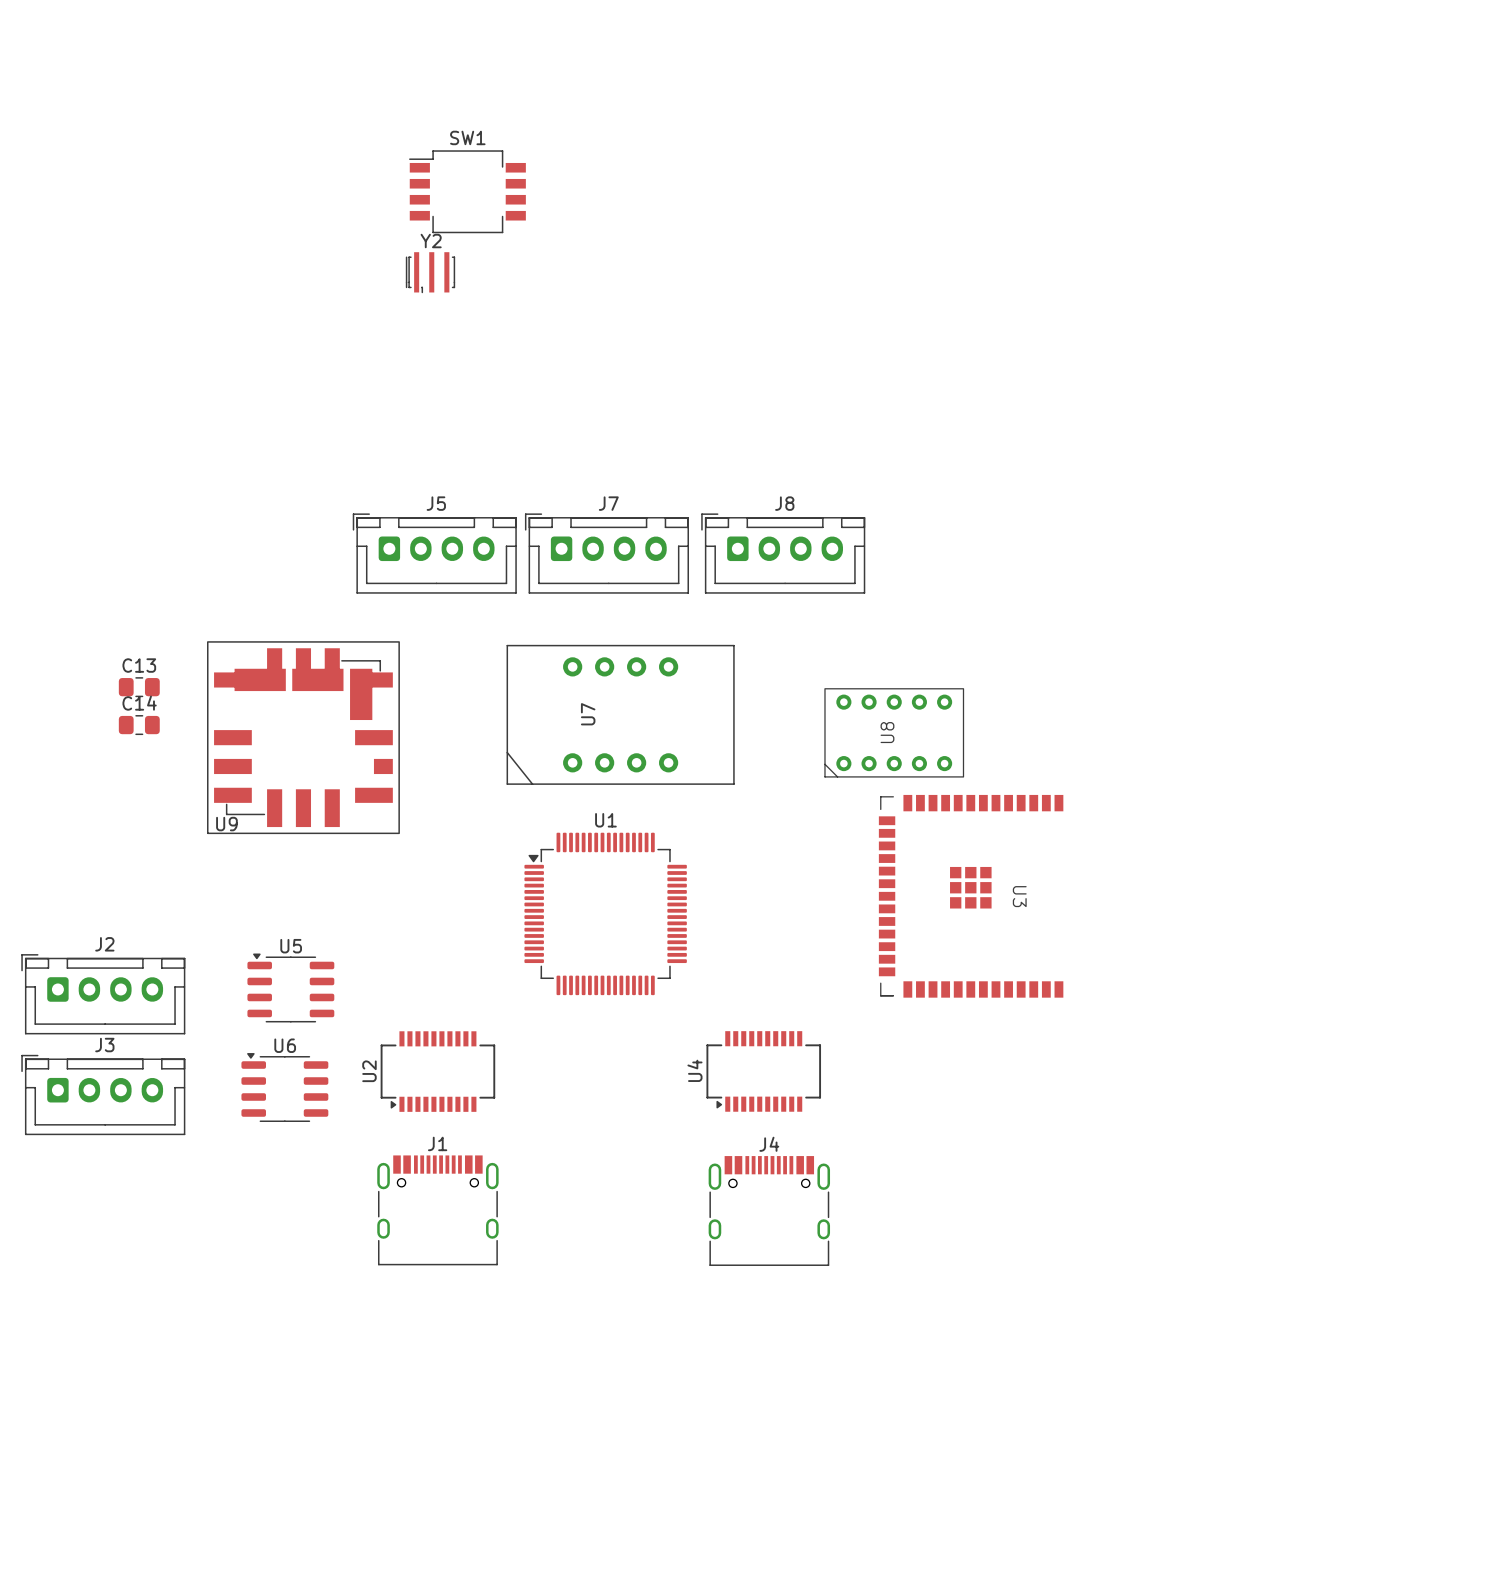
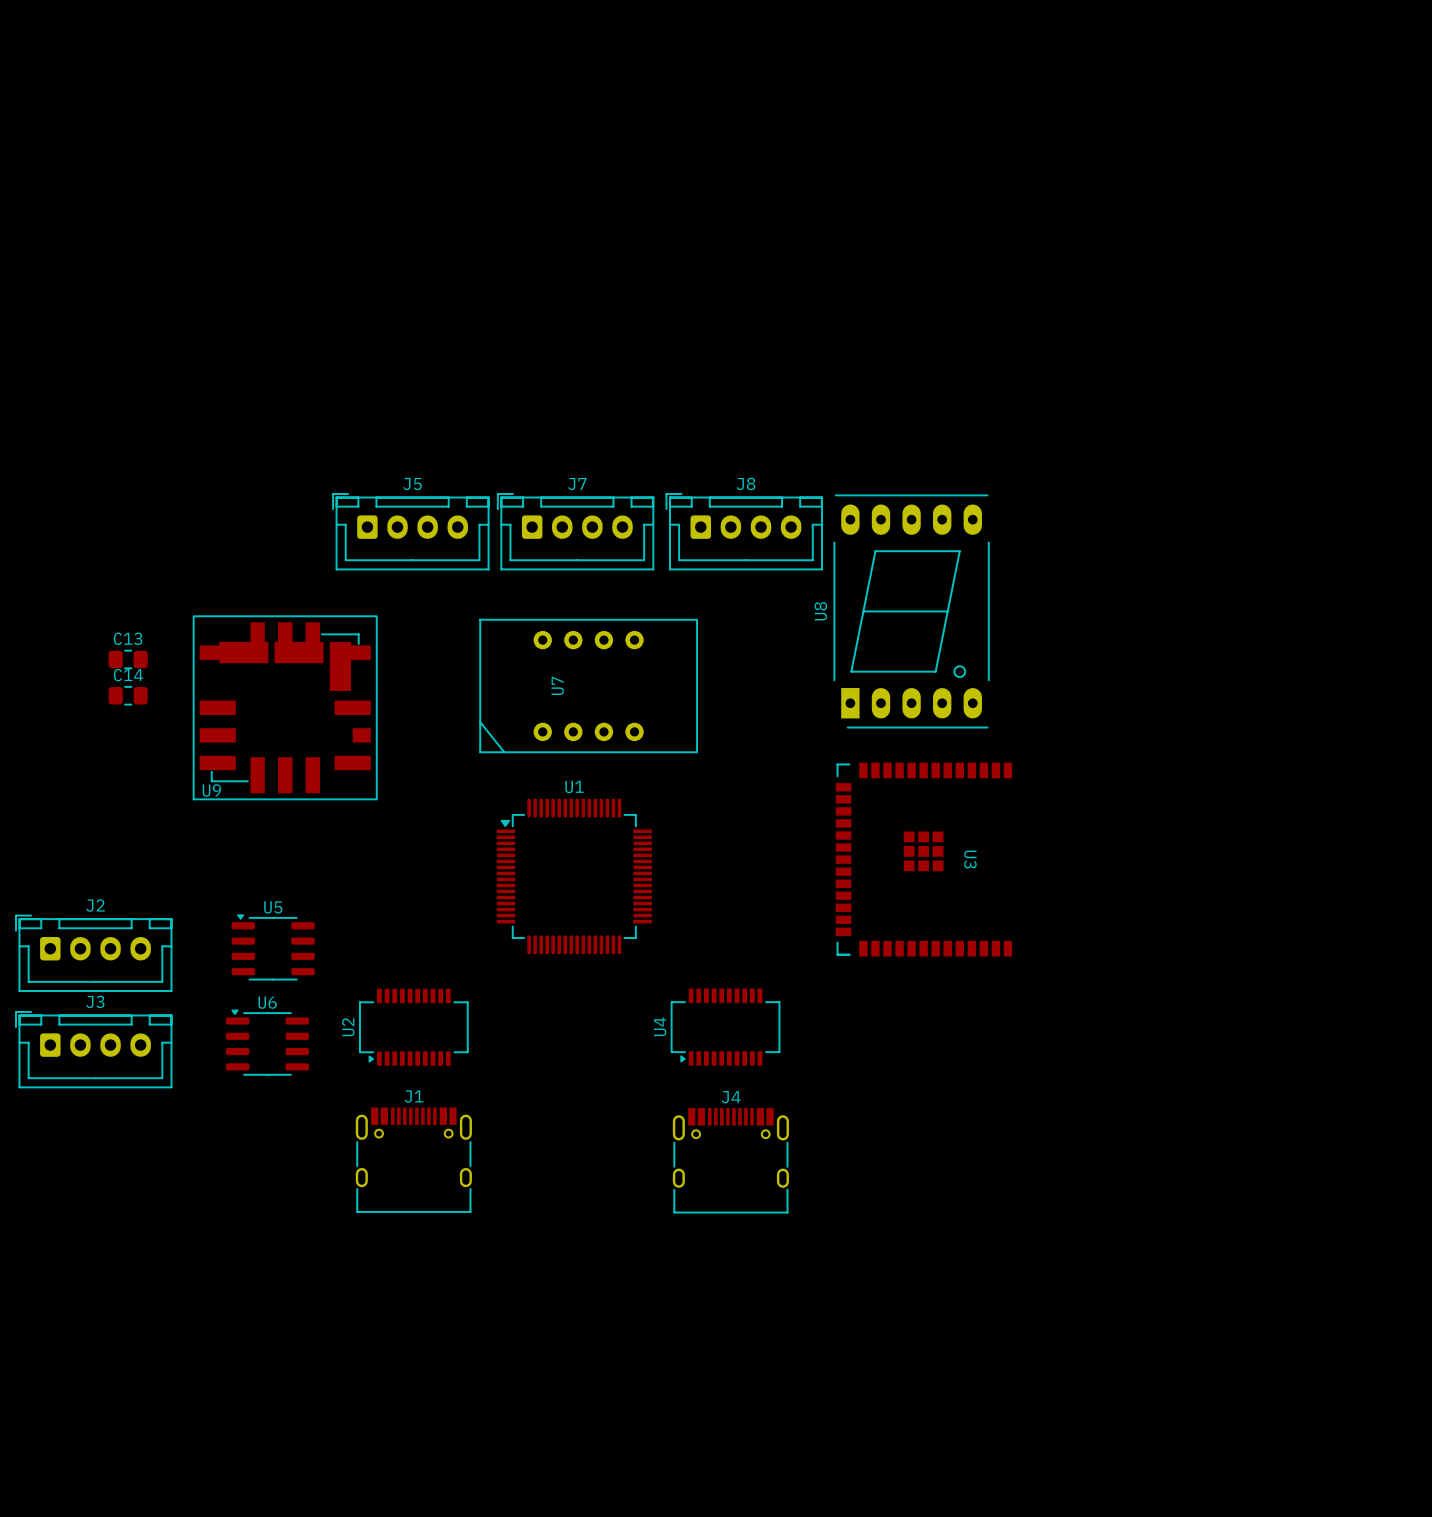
SW1: (467, 191) -> none
Y2: (430, 272) -> none
U8 footprint: [824, 688, 965, 778] -> [833, 494, 990, 729]
U8 name position: U8 (887, 732) -> U8 (820, 611)

